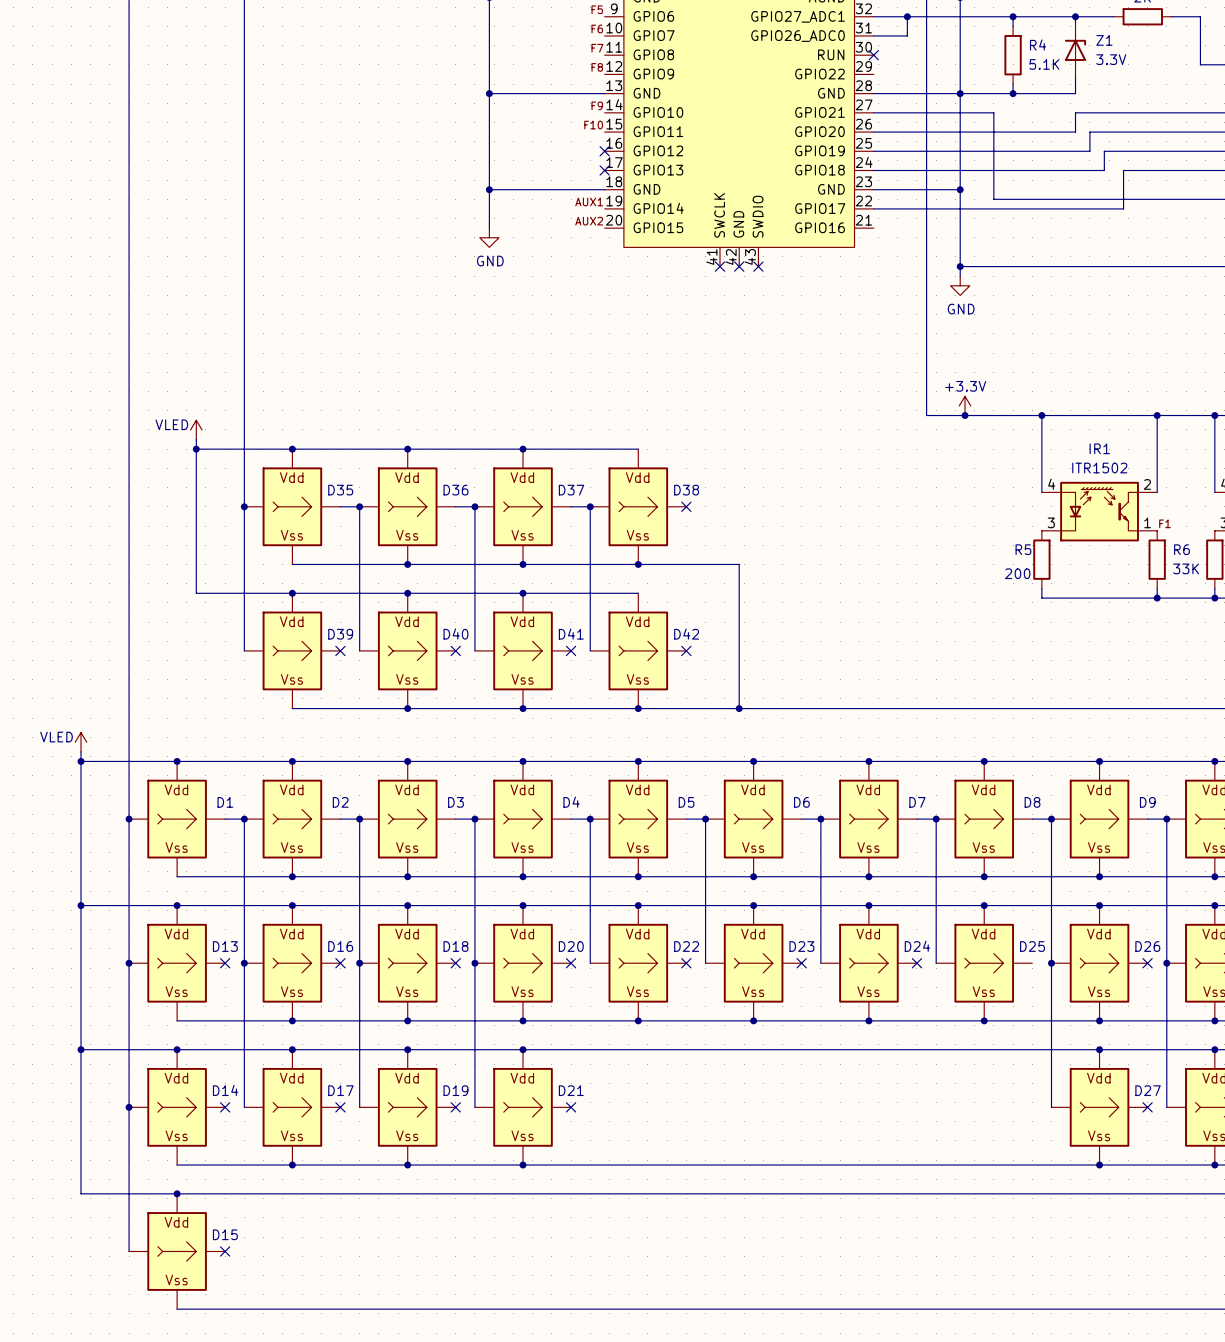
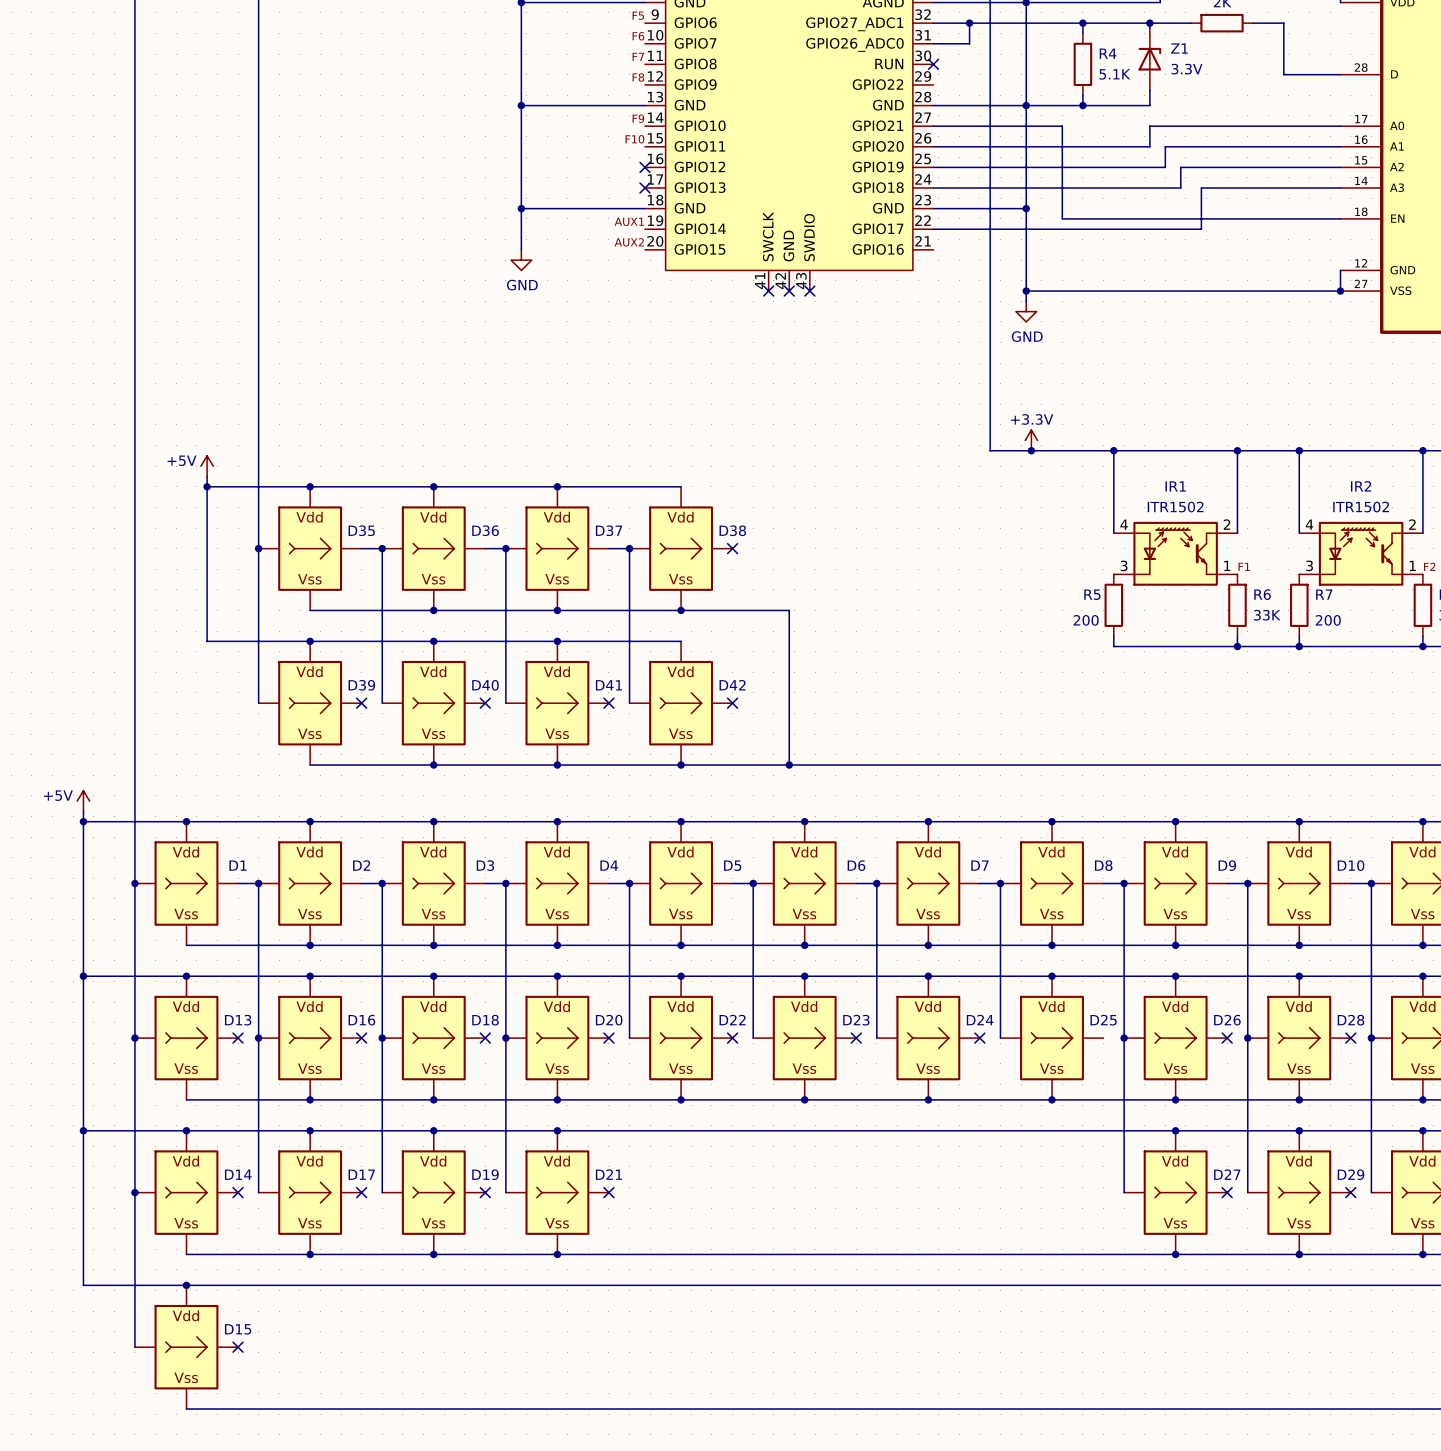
power symbol: VLED (196, 429) -> +5V (207, 466)
power symbol: VLED (81, 742) -> +5V (83, 801)

